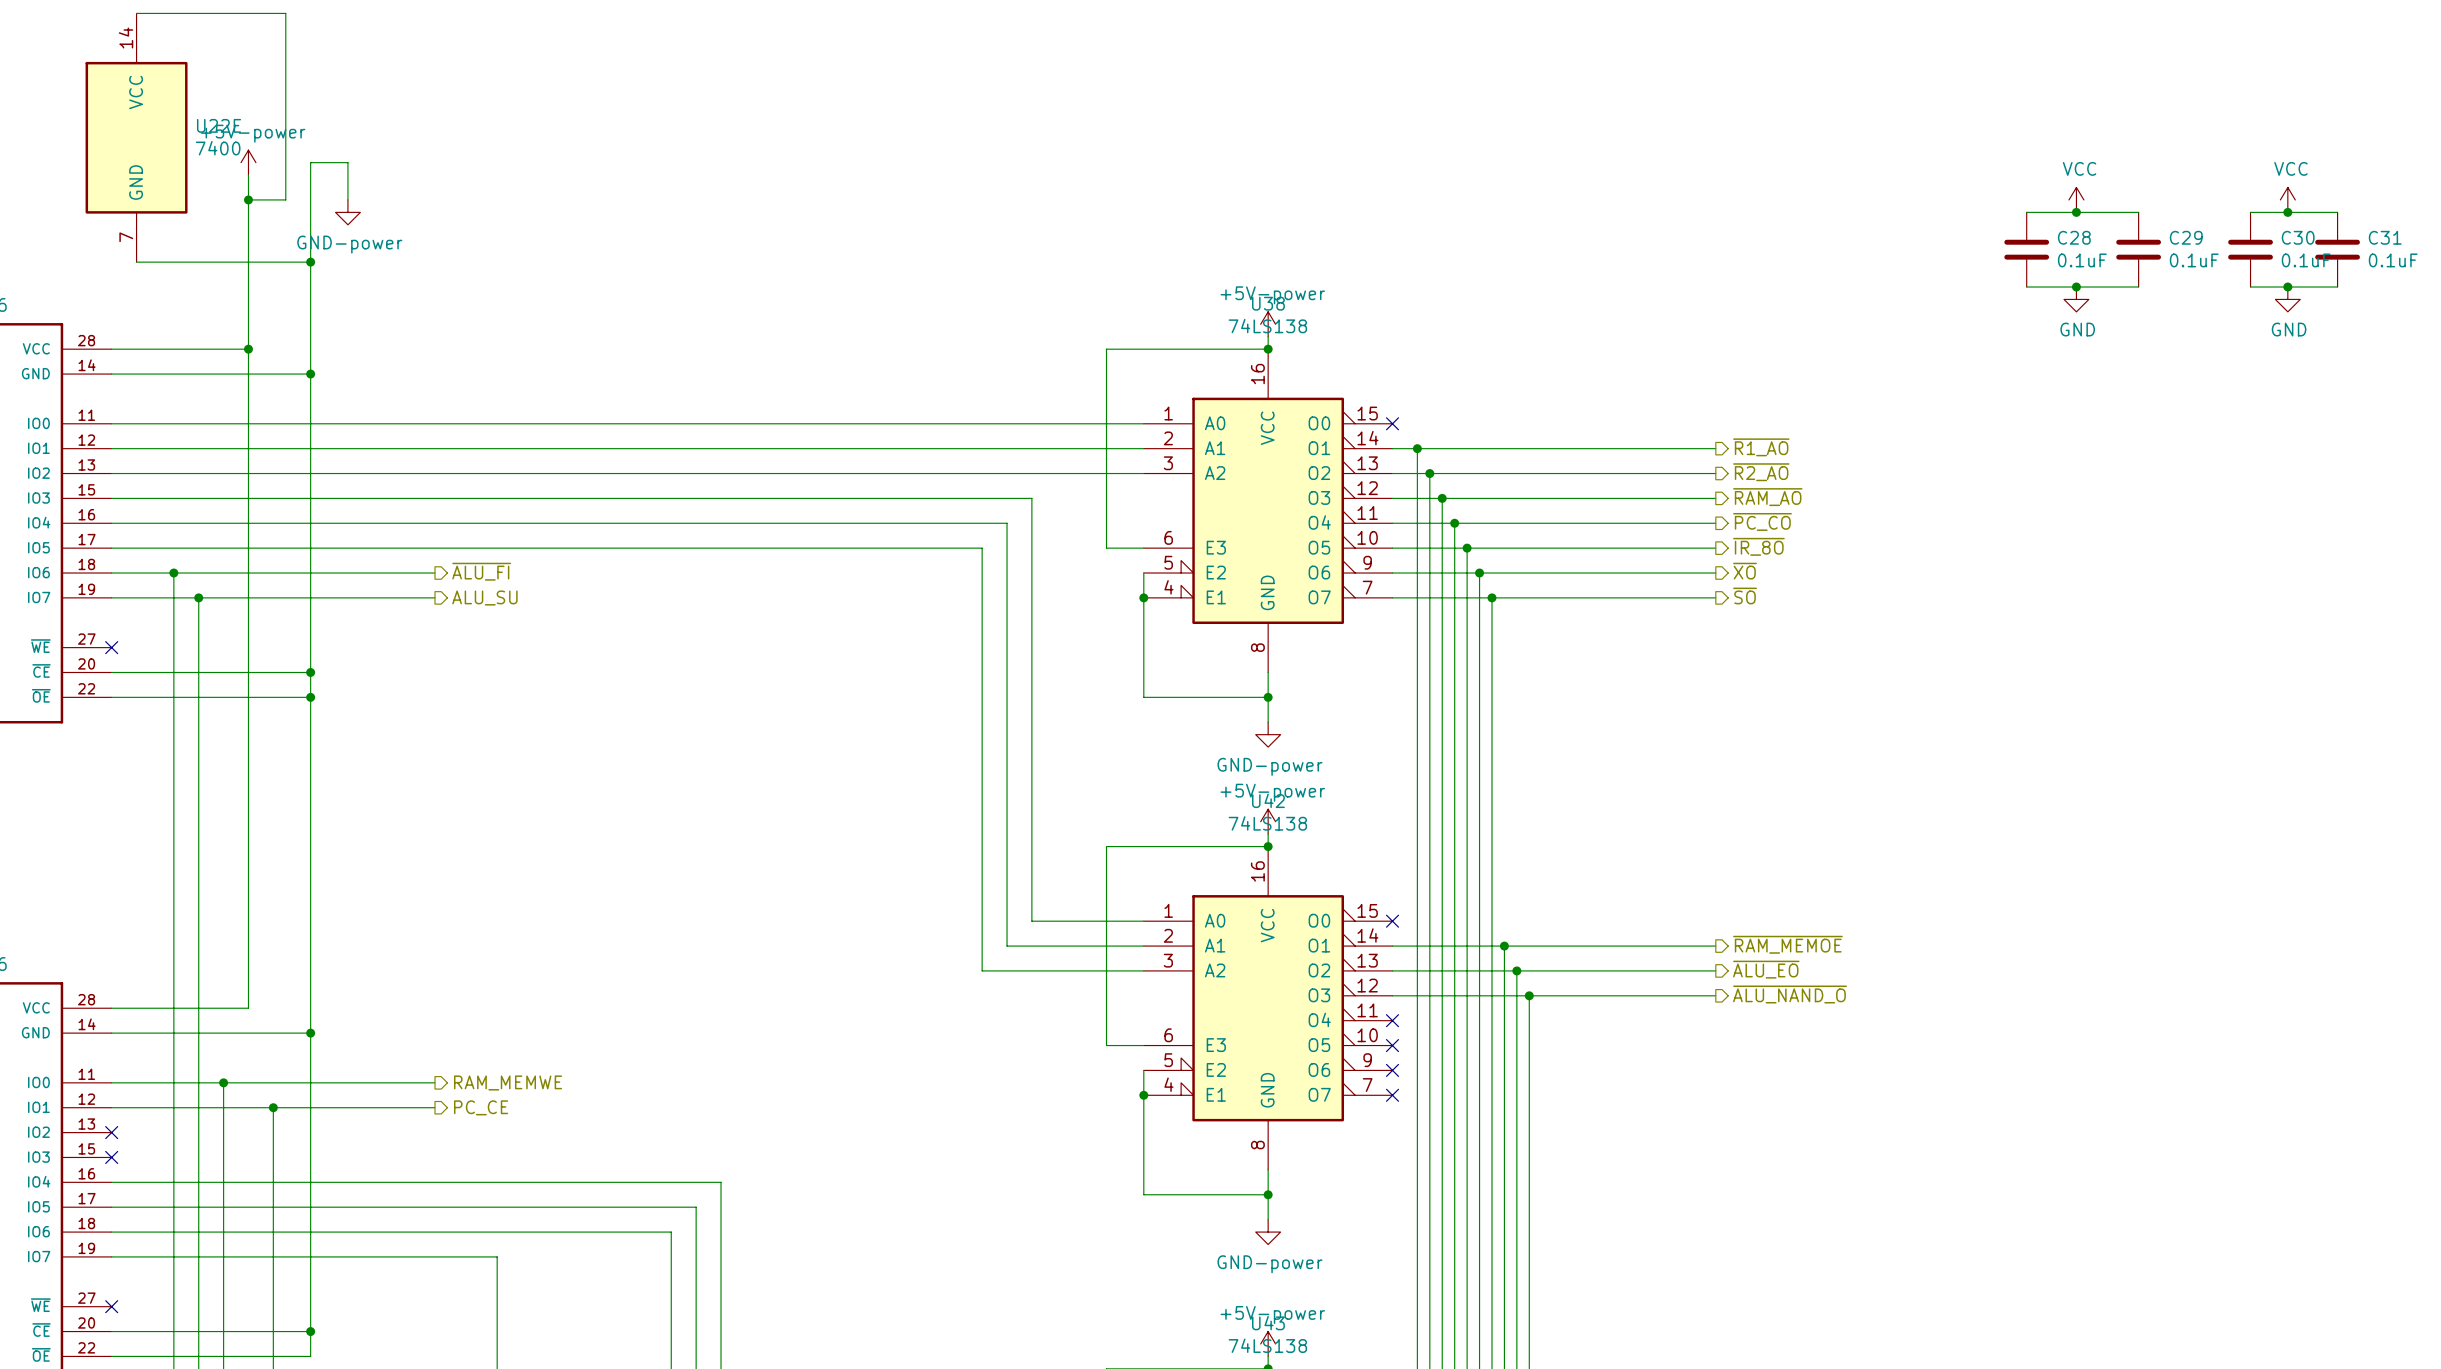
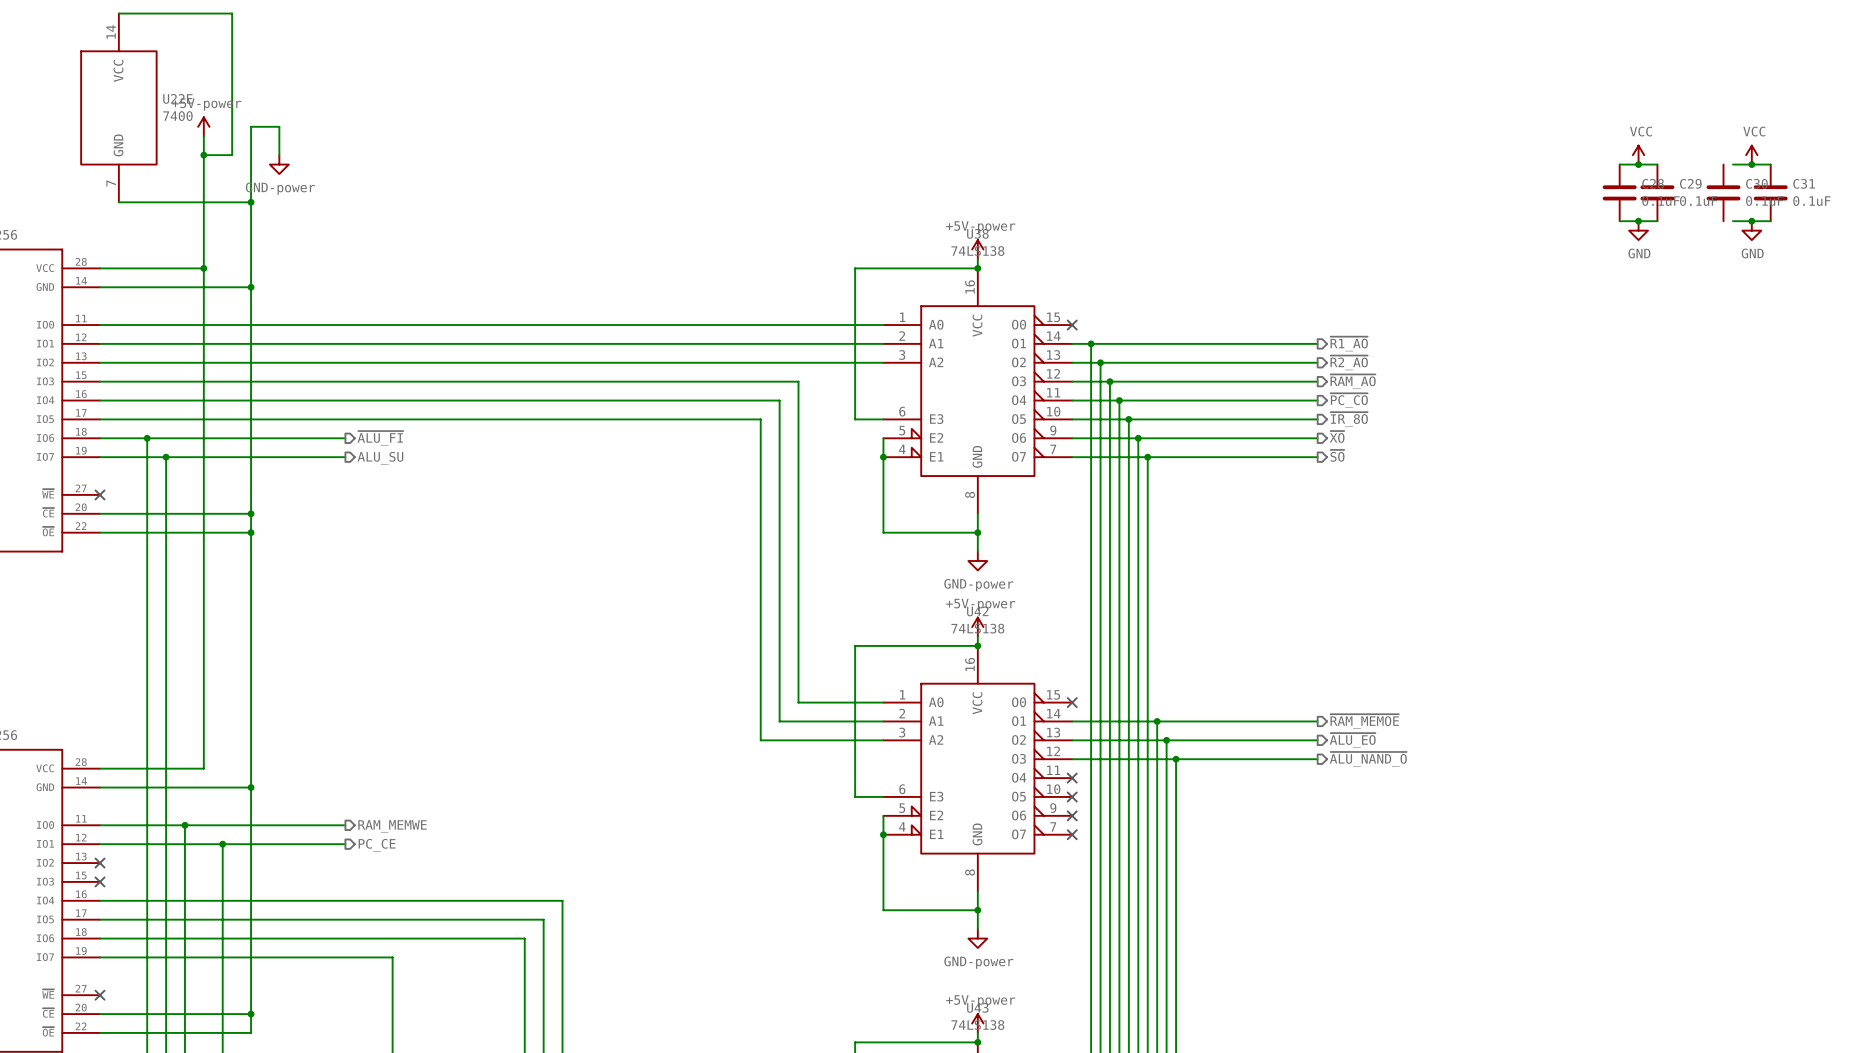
power symbol position: VCC (2076, 199) -> VCC (1638, 155)
wire: (2026, 212) (2113, 212) -> none
junction: (2076, 212) -> none
junction: none -> (1638, 164)
wire: (2250, 212) (2262, 212) -> none
wire: (2312, 212) (2337, 212) -> (1638, 164) (1657, 164)
C28 position: (2026, 249) -> (1619, 192)
C29 position: (2138, 249) -> (1657, 192)
C31 position: (2337, 249) -> (1770, 192)
wire: (2026, 287) (2113, 287) -> none
junction: (2076, 287) -> none
junction: none -> (1638, 221)
wire: (2250, 287) (2262, 287) -> none
wire: (2312, 287) (2337, 287) -> (1638, 221) (1657, 221)
power symbol position: GND (2076, 299) -> GND (1638, 230)

